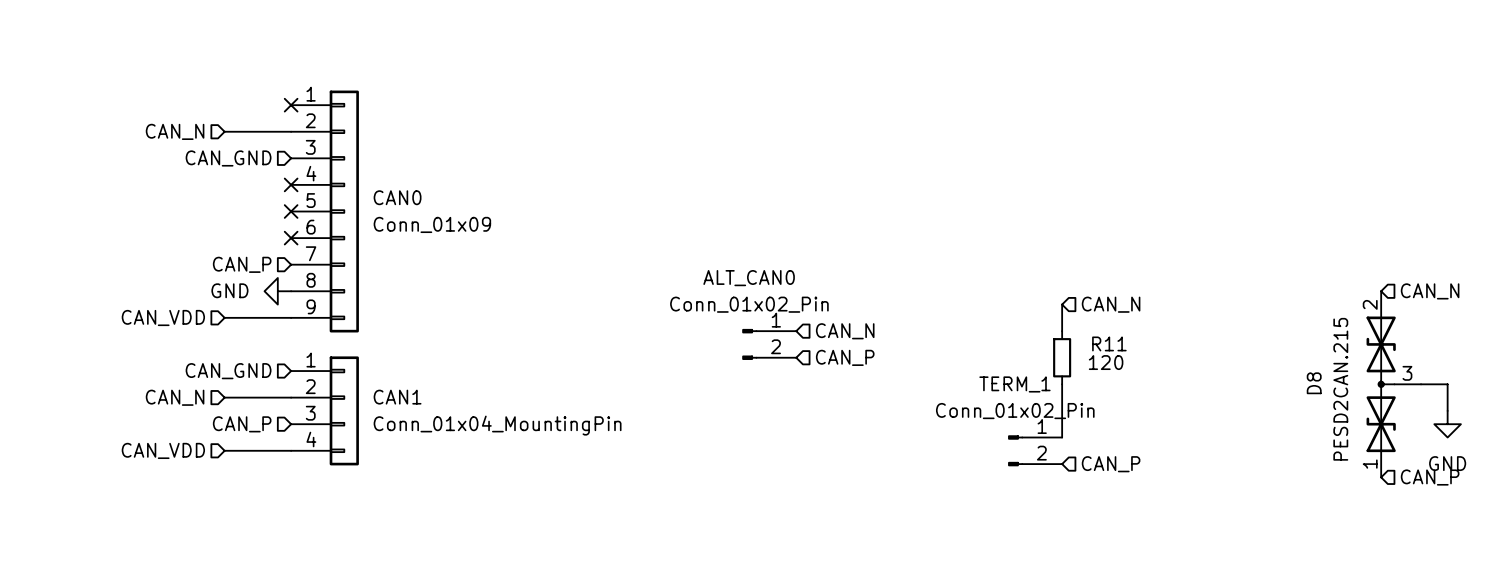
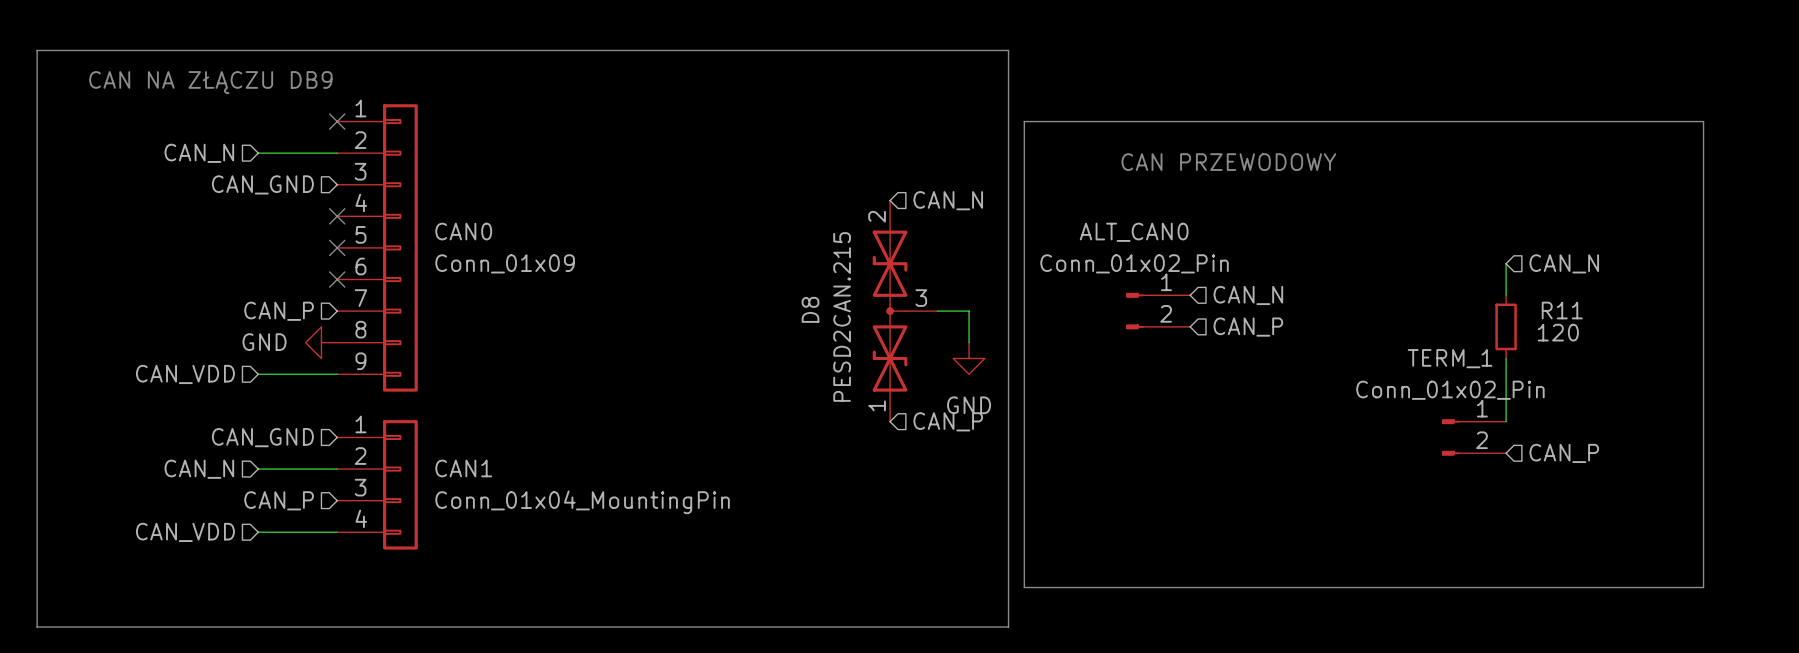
line: none -> (37, 50) (1008, 50) (1008, 627) (37, 627) (37, 50)
text: none -> CAN NA ZŁĄCZU DB9 (210, 82)
line: none -> (1024, 121) (1703, 121) (1703, 587) (1024, 587) (1024, 121)
text: none -> CAN PRZEWODOWY (1228, 162)
hierarchical label: none -> CAN_N (948, 200)
hierarchical label: none -> CAN_N (1564, 263)
wire: none -> (937, 311) (969, 311) (969, 342)
hierarchical label: none -> CAN_P (1248, 327)
hierarchical label: CAN_N (1430, 291) -> none
power symbol: none -> GND (969, 358)
wire: (1062, 304) (1062, 331) -> (1506, 263) (1506, 295)
hierarchical label position: CAN_N (1111, 304) -> CAN_N (1248, 295)
hierarchical label: CAN_N (845, 331) -> none
ALT_CAN0 position: (769, 344) -> (1158, 311)
hierarchical label position: CAN_P (845, 357) -> CAN_P (948, 421)
R11 position: (1062, 357) -> (1506, 326)
wire: (1062, 384) (1062, 437) -> (1506, 358) (1506, 421)
hierarchical label: none -> CAN_P (1564, 453)
D8 position: (1393, 384) -> (905, 311)
wire: (1421, 384) (1447, 384) (1447, 410) -> none
power symbol: GND (1447, 424) -> none
TERM_1 position: (1035, 450) -> (1474, 437)
hierarchical label: CAN_P (1111, 464) -> none
hierarchical label: CAN_P (1430, 477) -> none

